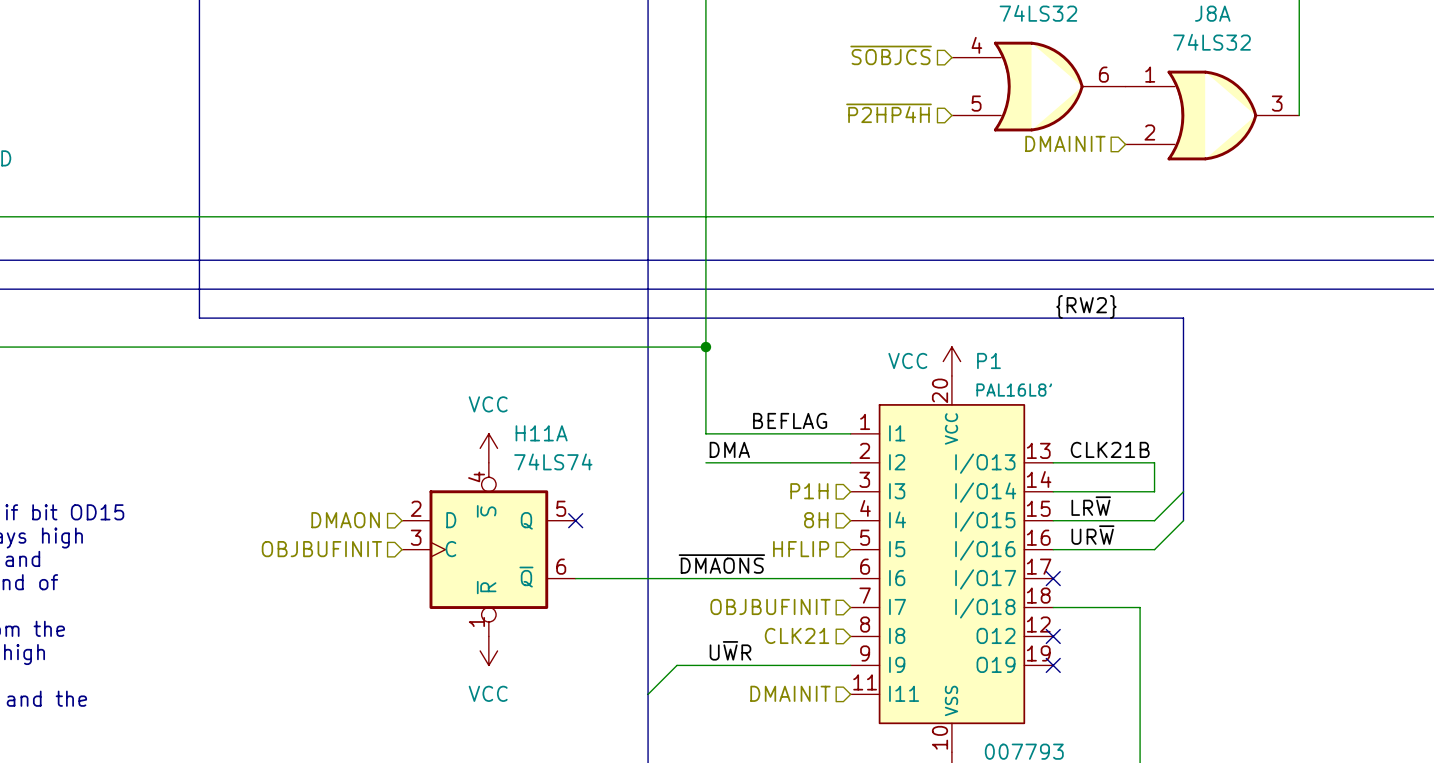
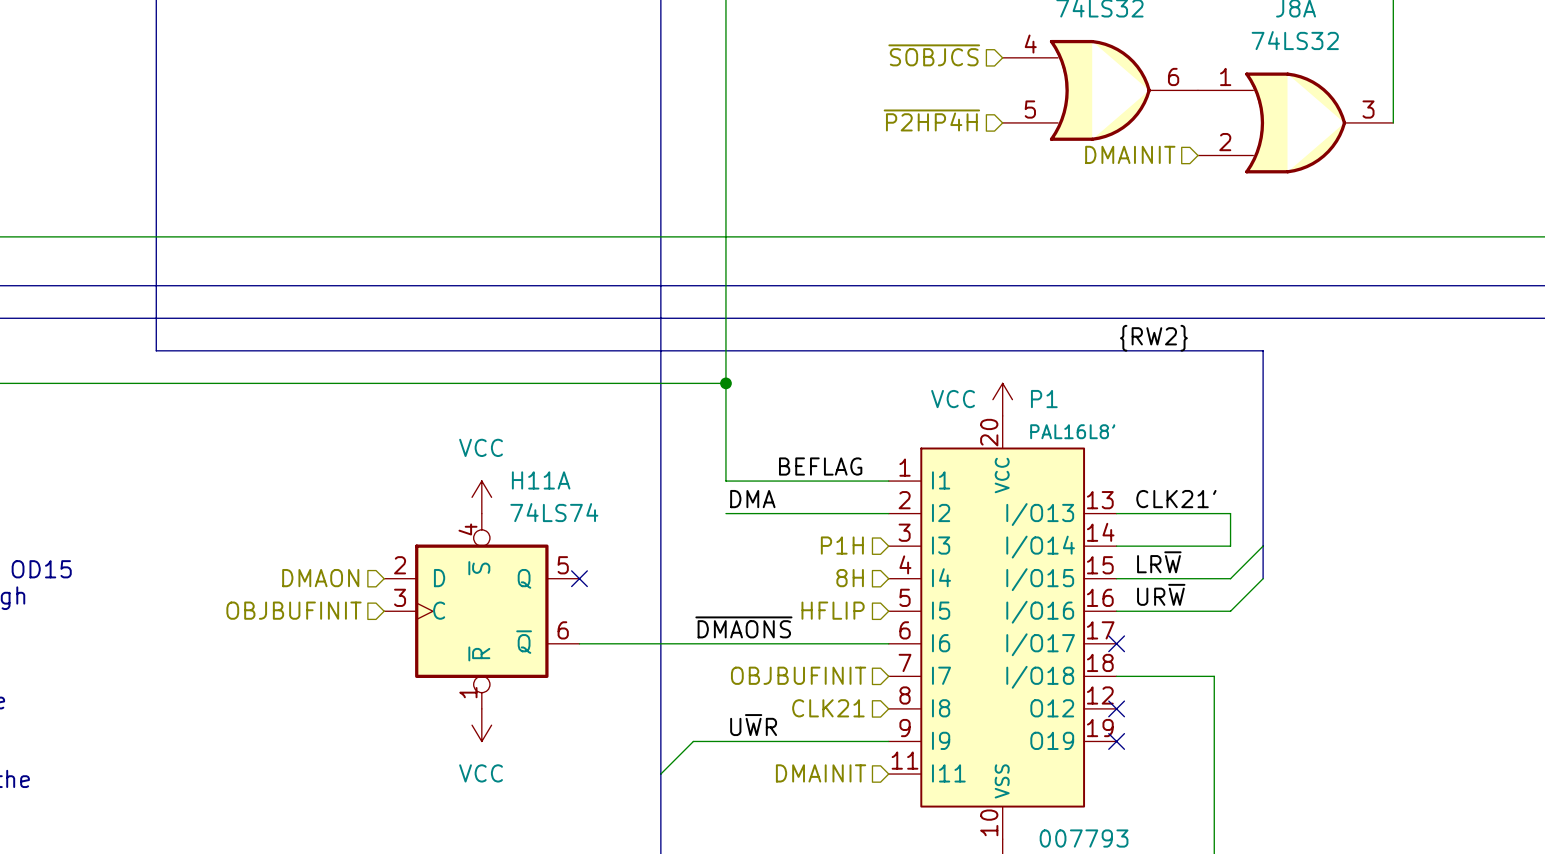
label: CLK21B (1110, 449) -> CLK21' (1176, 499)

